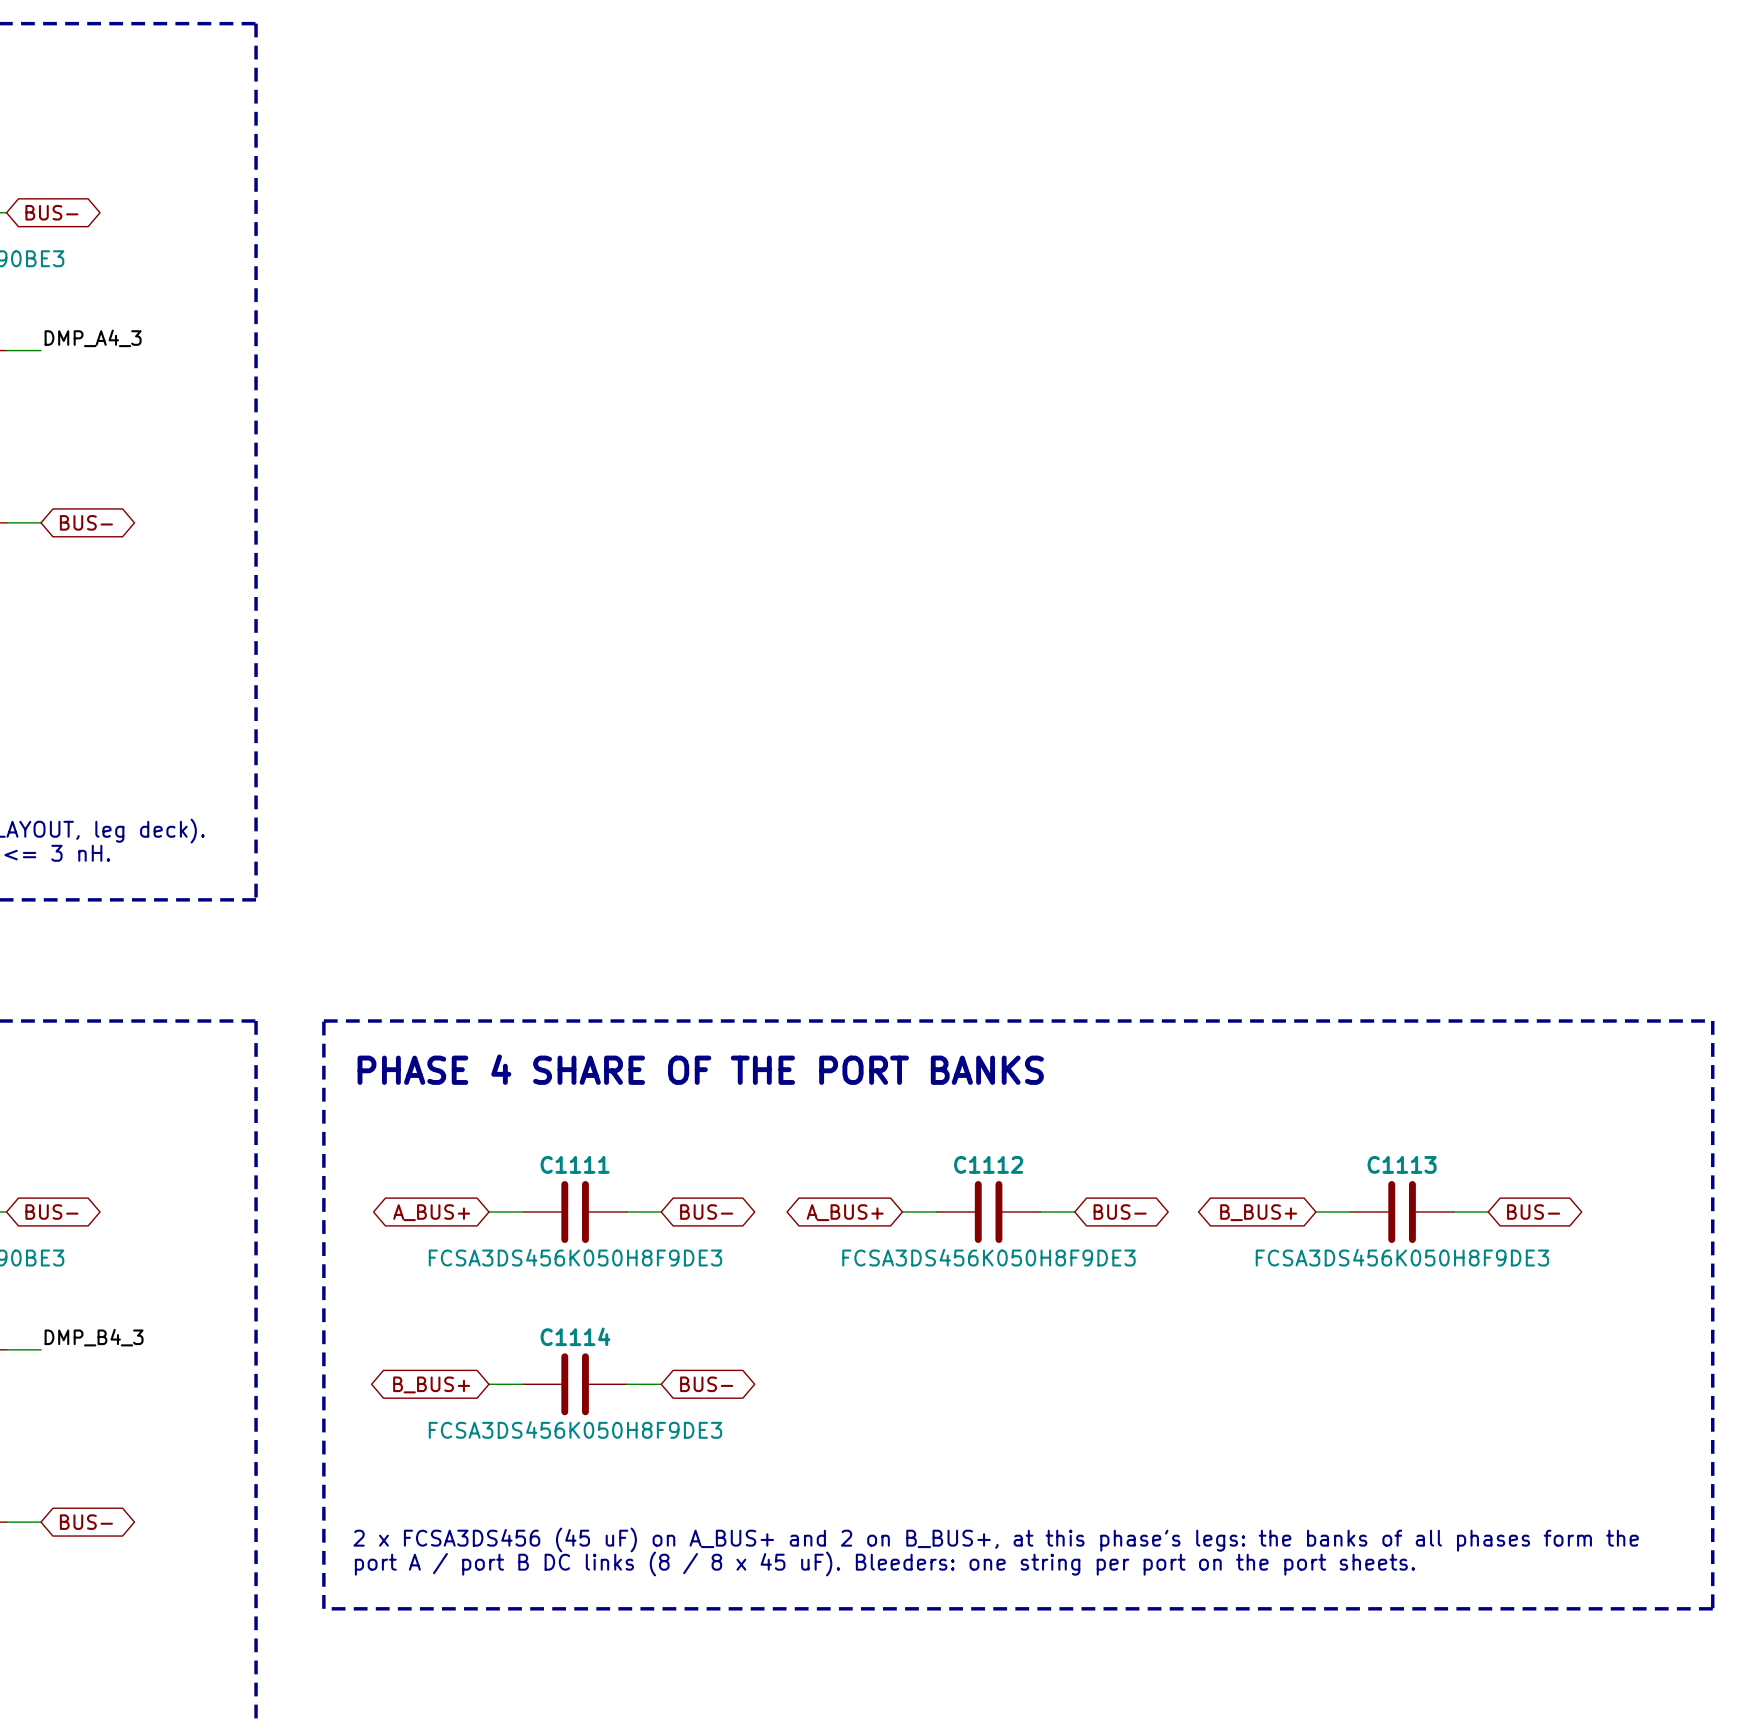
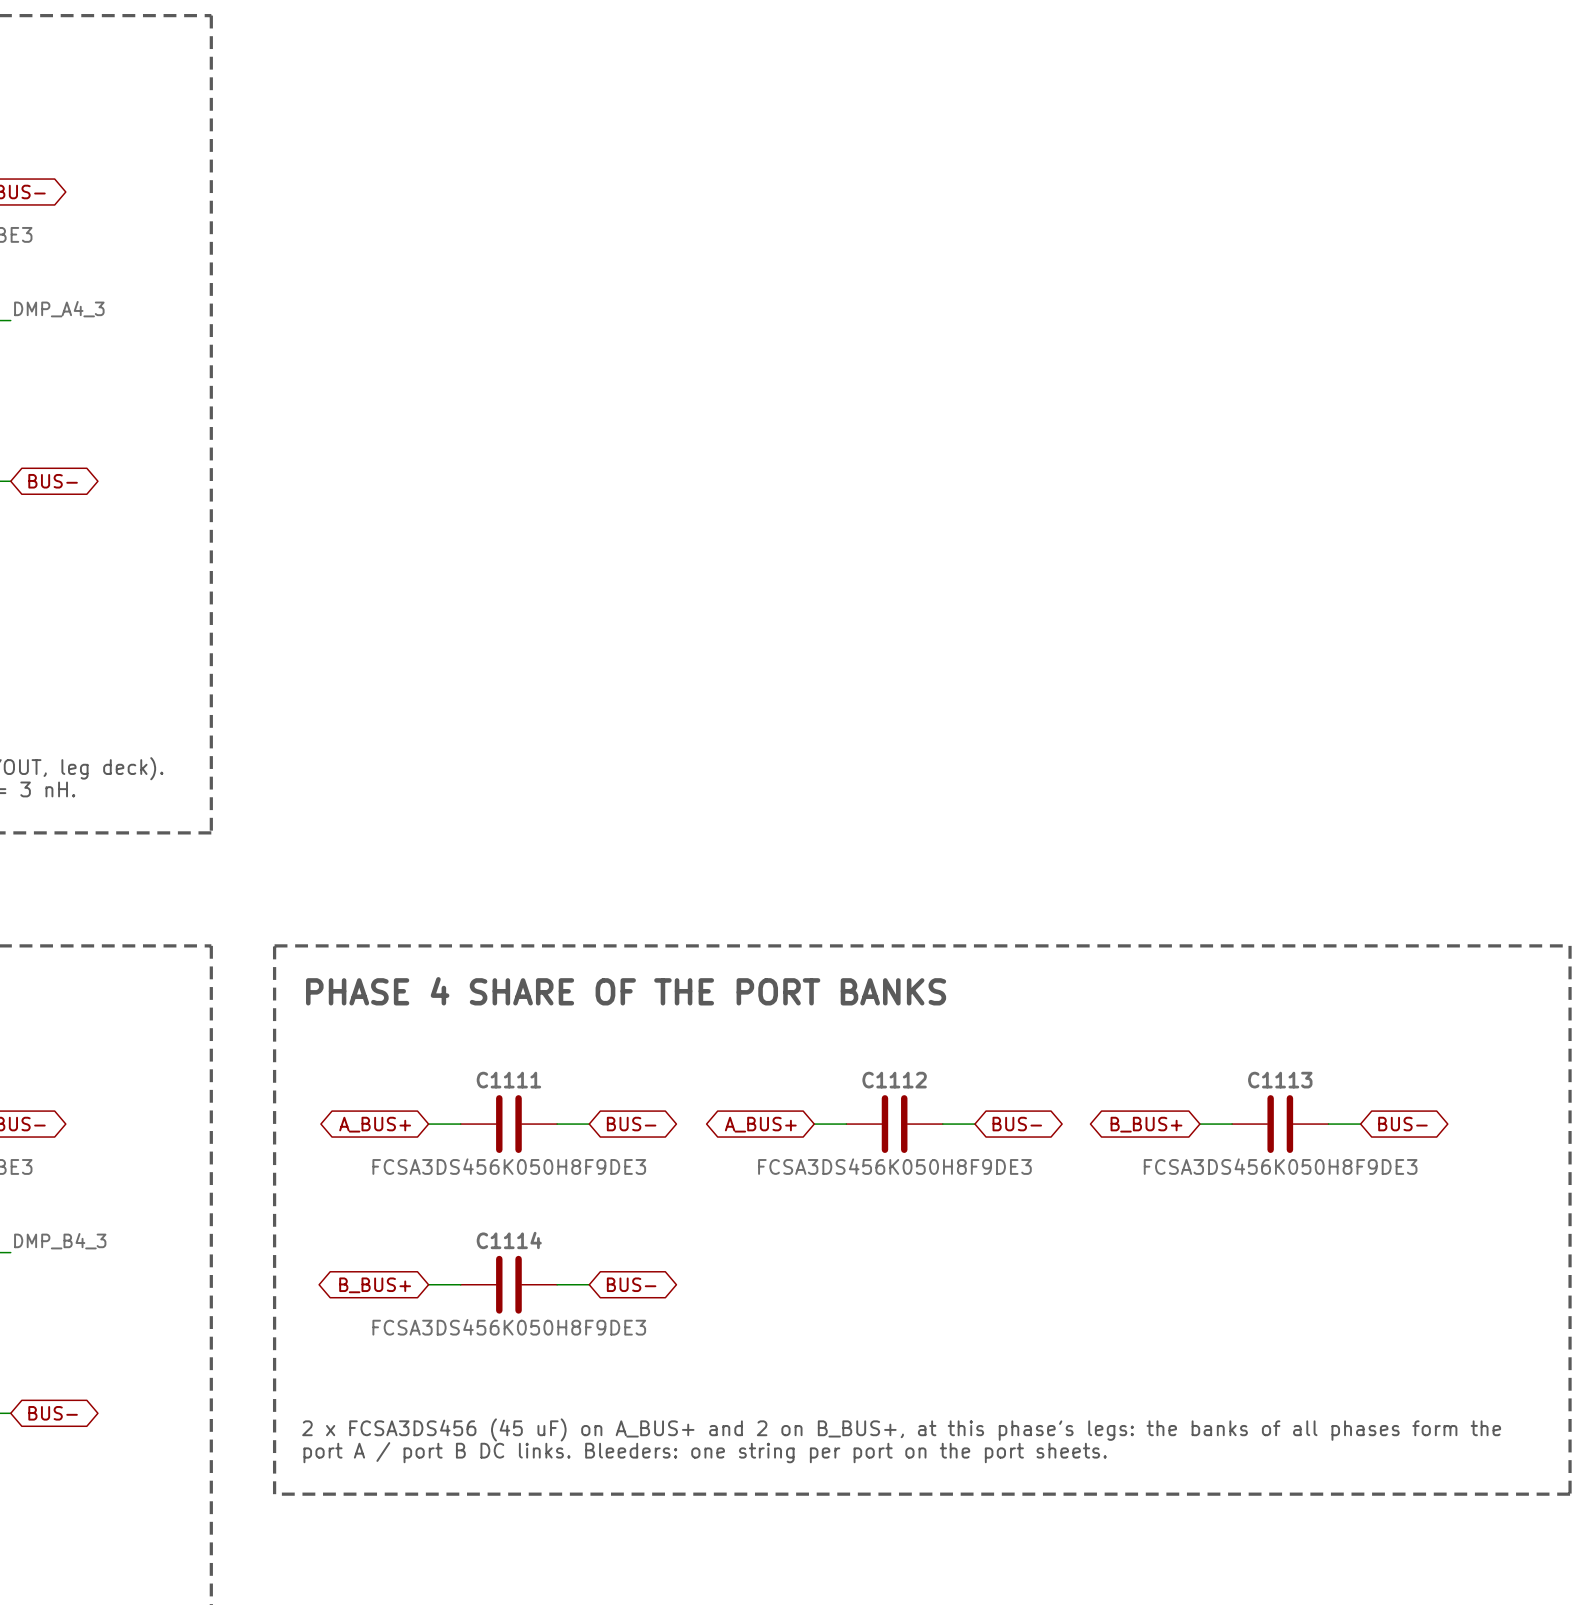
text: port A / port B DC links (8 / 8 x 45 uF). Bleeders: one string per port on the port sheets. (884, 1563) -> port A / port B DC links. Bleeders: one string per port on the port sheets. (705, 1452)

